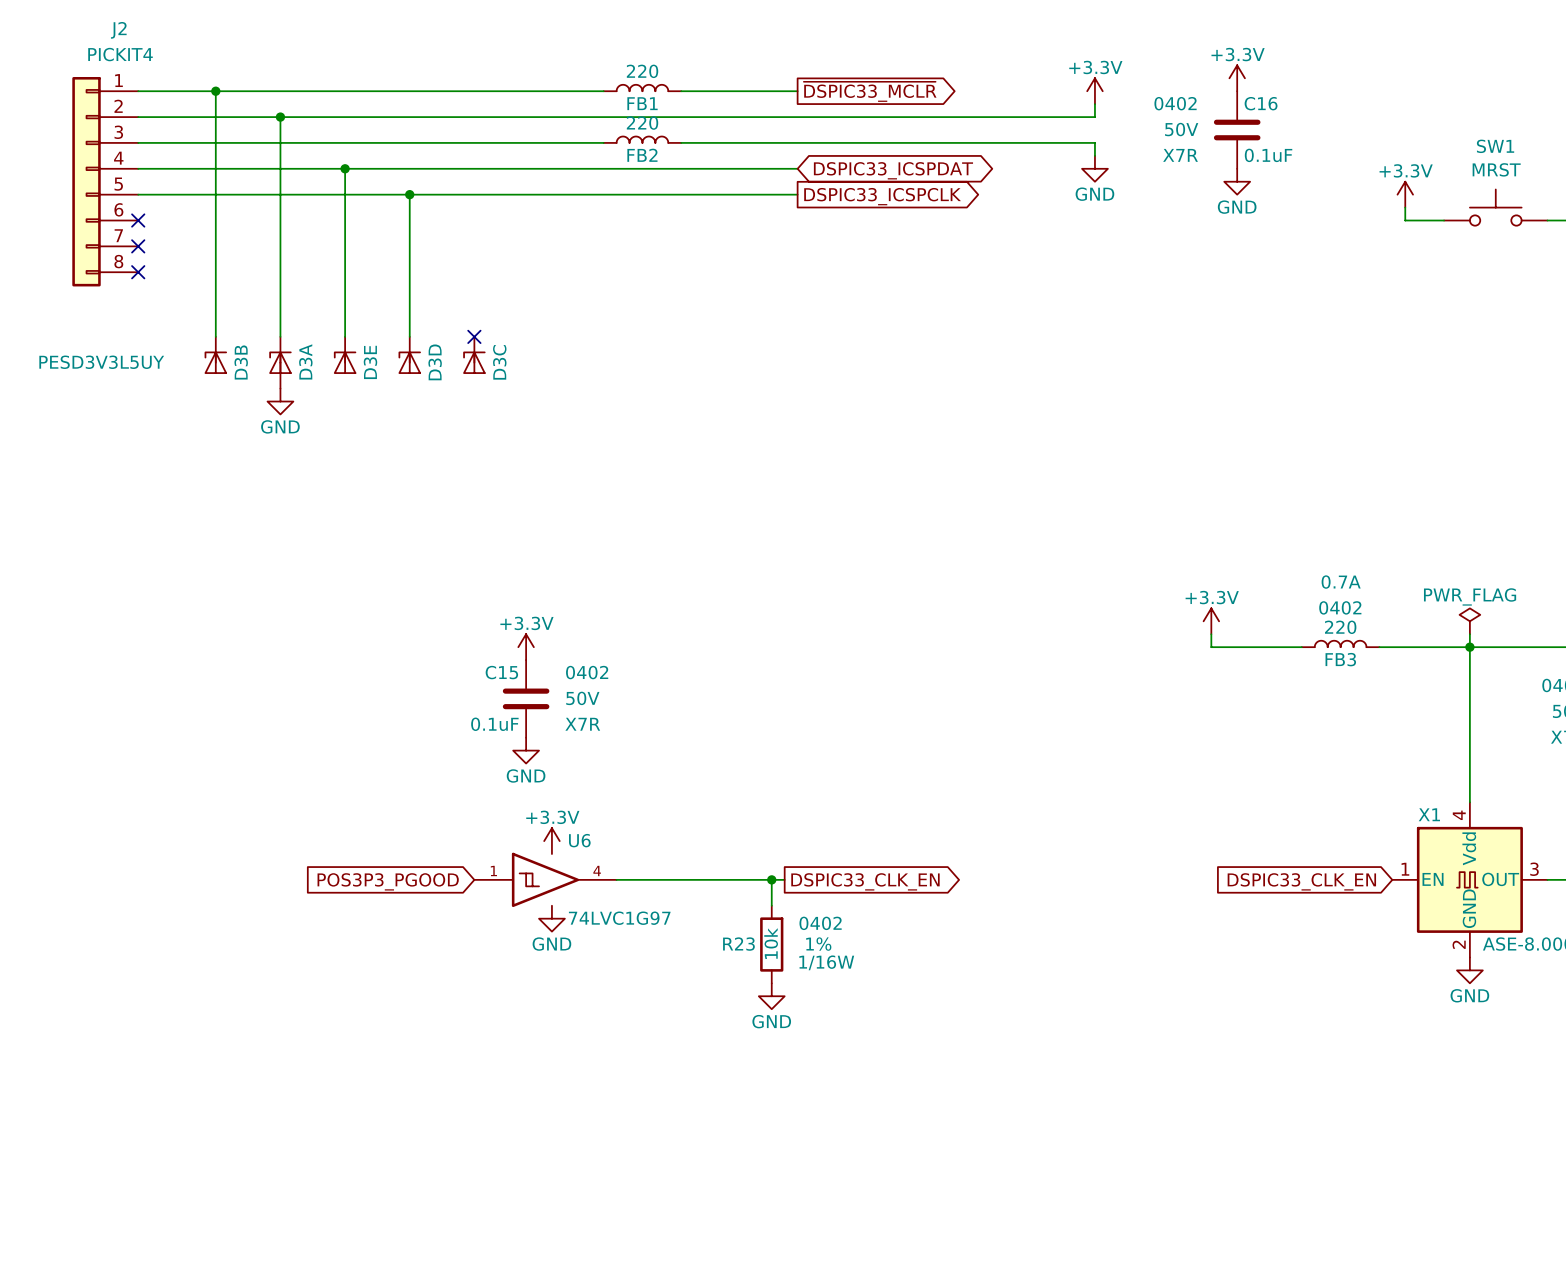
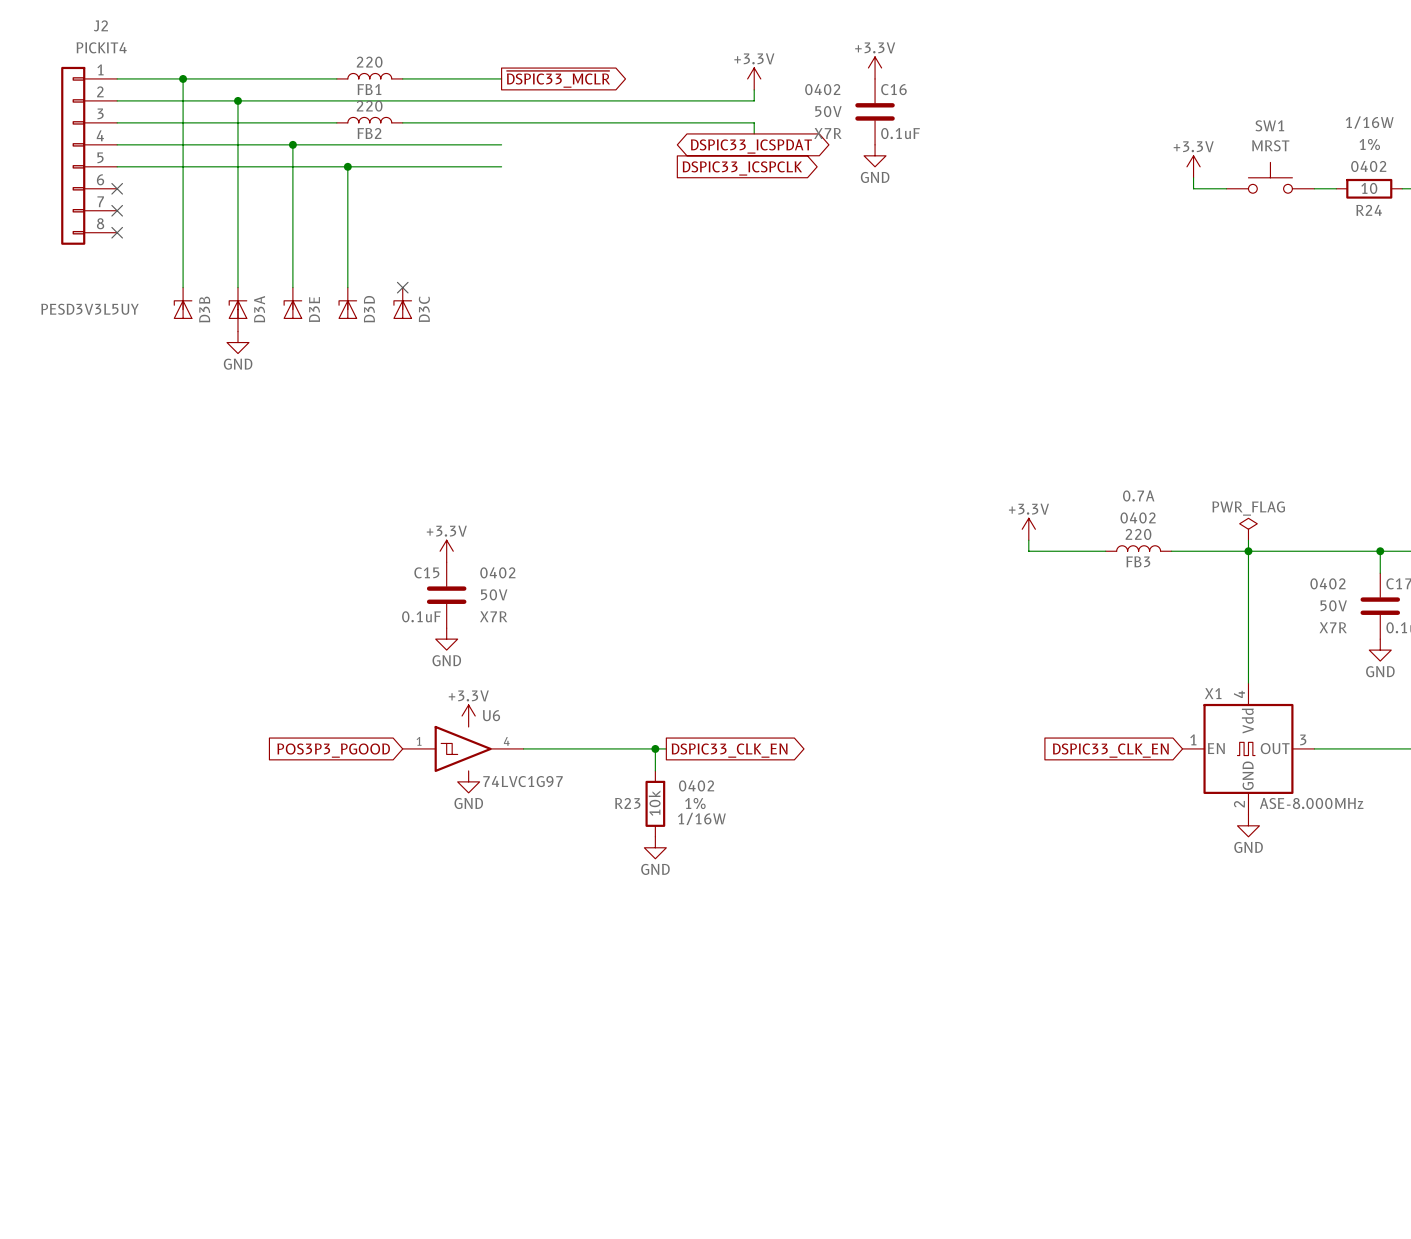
power symbol: +3.3V (1237, 78) -> none
FB1 position: (642, 88) -> (369, 76)
wire: (396, 91) (474, 91) -> none
wire: (590, 91) (603, 91) -> none
wire: (681, 91) (797, 91) -> none
global label position: ~{DSPIC33_MCLR} (870, 91) -> ~{DSPIC33_MCLR} (558, 79)
power symbol: none -> +3.3V (754, 78)
power symbol position: +3.3V (1094, 91) -> +3.3V (875, 67)
wire: (1094, 104) (1094, 117) (888, 117) -> (754, 89) (754, 100)
C16 position: (1237, 130) -> (875, 111)
FB2 position: (642, 139) -> (369, 120)
wire: (396, 142) (474, 142) -> (512, 122) (578, 122)
wire: (888, 142) (1094, 142) (1094, 155) -> (754, 122) (754, 133)
wire: (590, 168) (797, 168) -> none
power symbol position: GND (1094, 168) -> GND (875, 155)
power symbol: GND (1237, 181) -> none
wire: (590, 194) (797, 194) -> none

